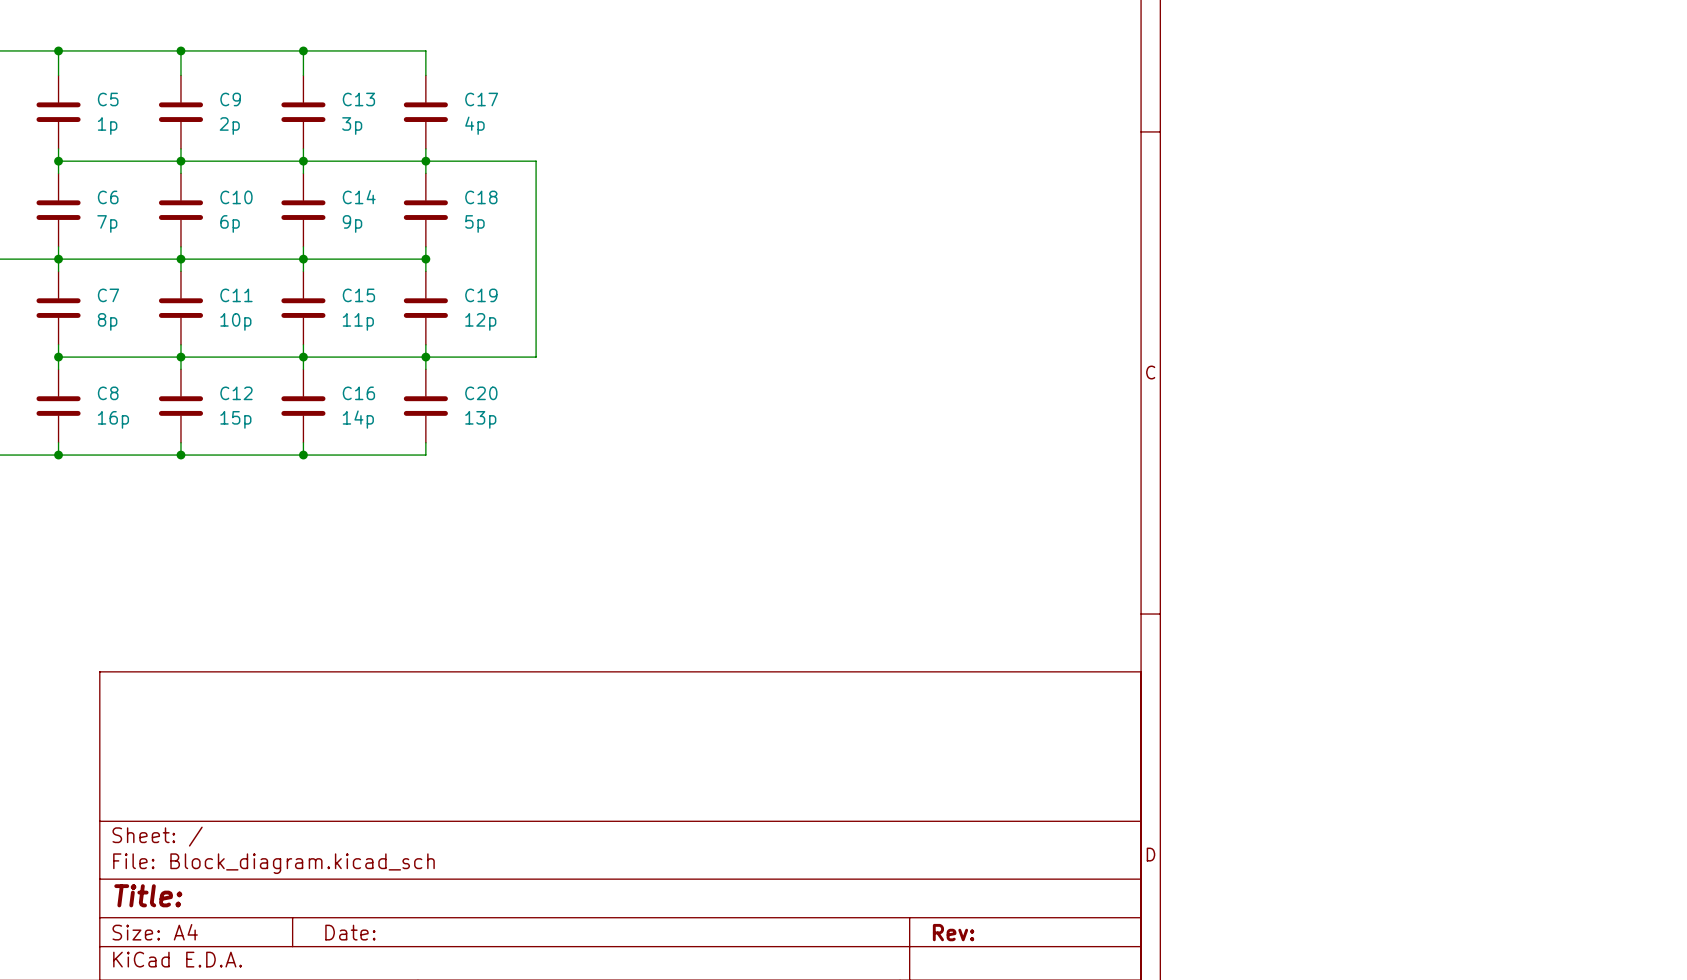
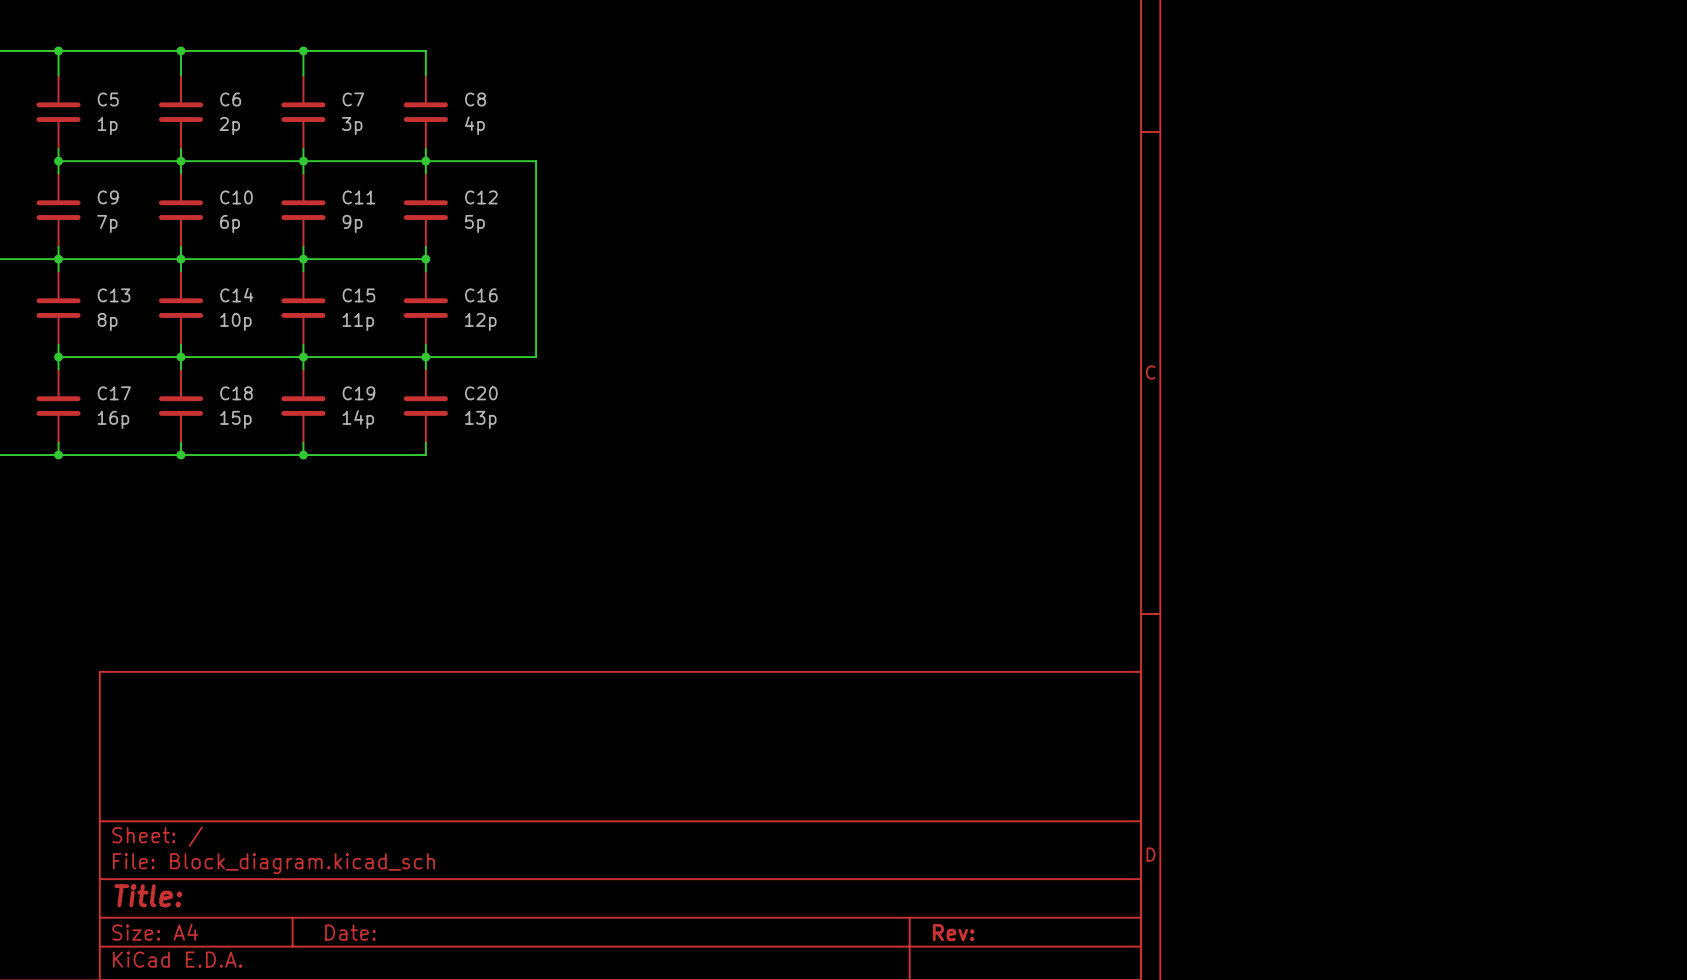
C9 name: C9 (230, 99) -> C6 (230, 99)
C13 name: C13 (358, 99) -> C7 (353, 99)
C17 name: C17 (481, 99) -> C8 (475, 99)
C6 name: C6 (108, 197) -> C9 (108, 197)
C14 name: C14 (359, 197) -> C11 (358, 197)
C18 name: C18 (481, 197) -> C12 (481, 197)
C7 name: C7 (108, 295) -> C13 (114, 295)
C11 name: C11 (236, 295) -> C14 (236, 295)
C19 name: C19 (481, 295) -> C16 (481, 295)
C8 name: C8 (108, 393) -> C17 (114, 393)
C12 name: C12 (236, 393) -> C18 (236, 393)
C16 name: C16 (358, 393) -> C19 (358, 393)

